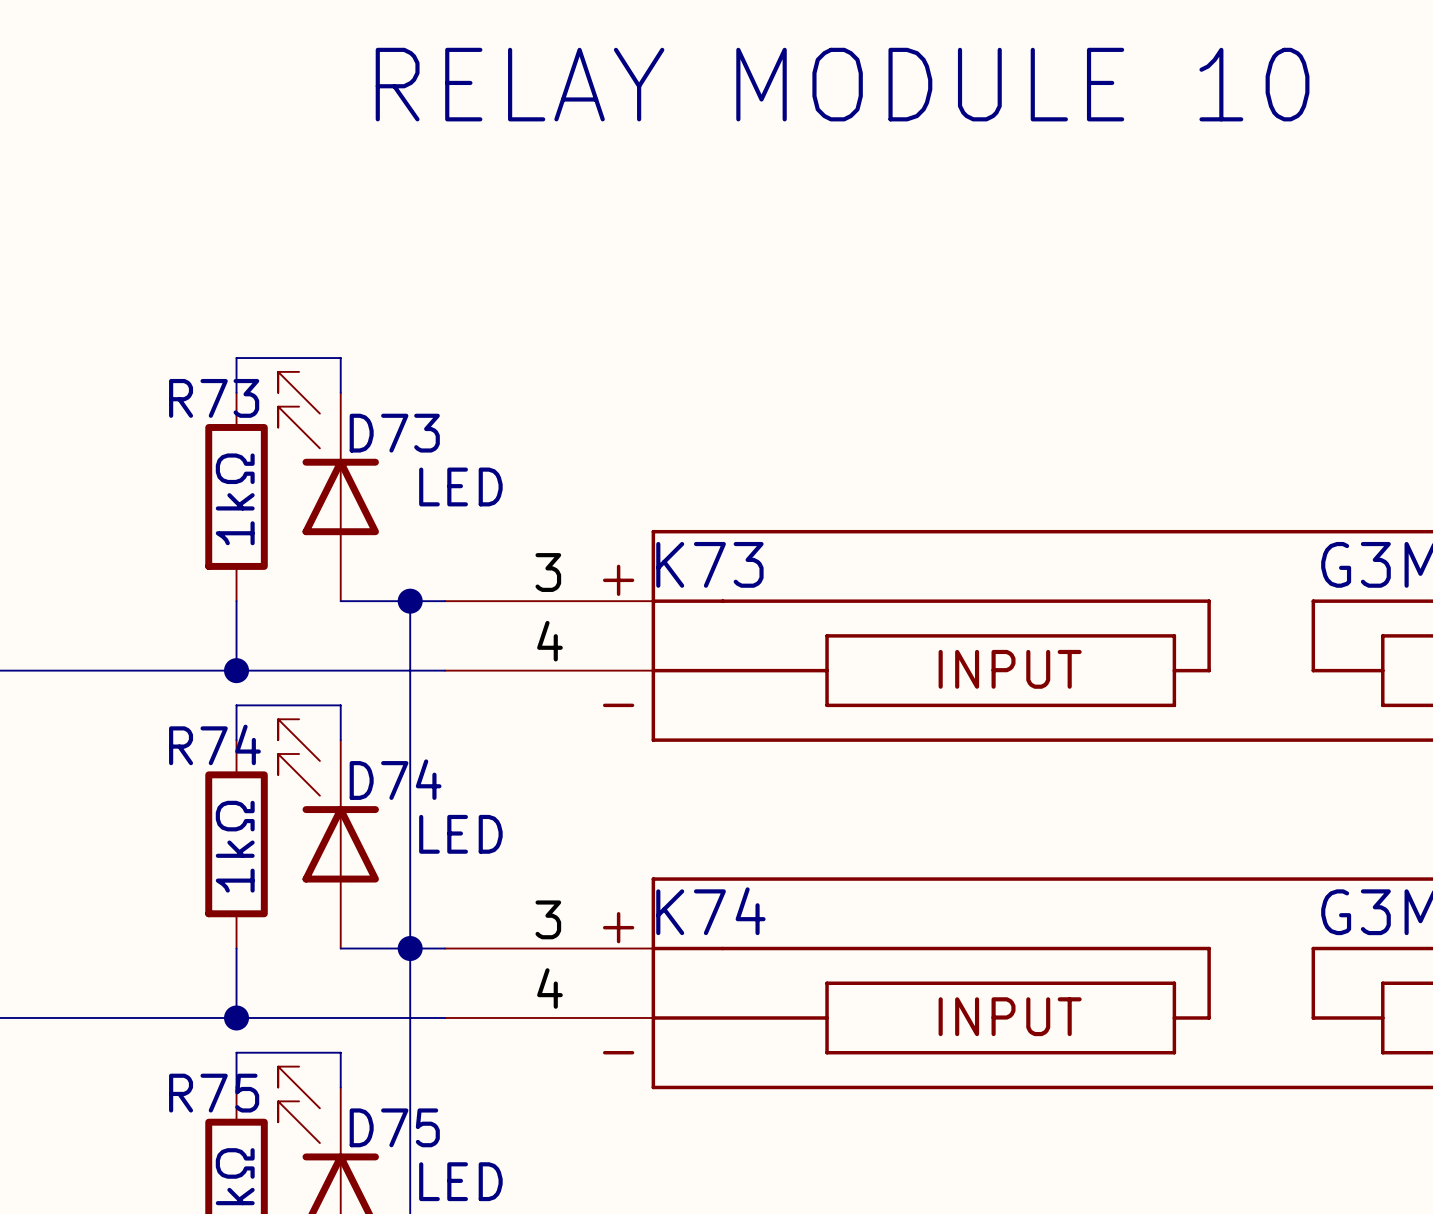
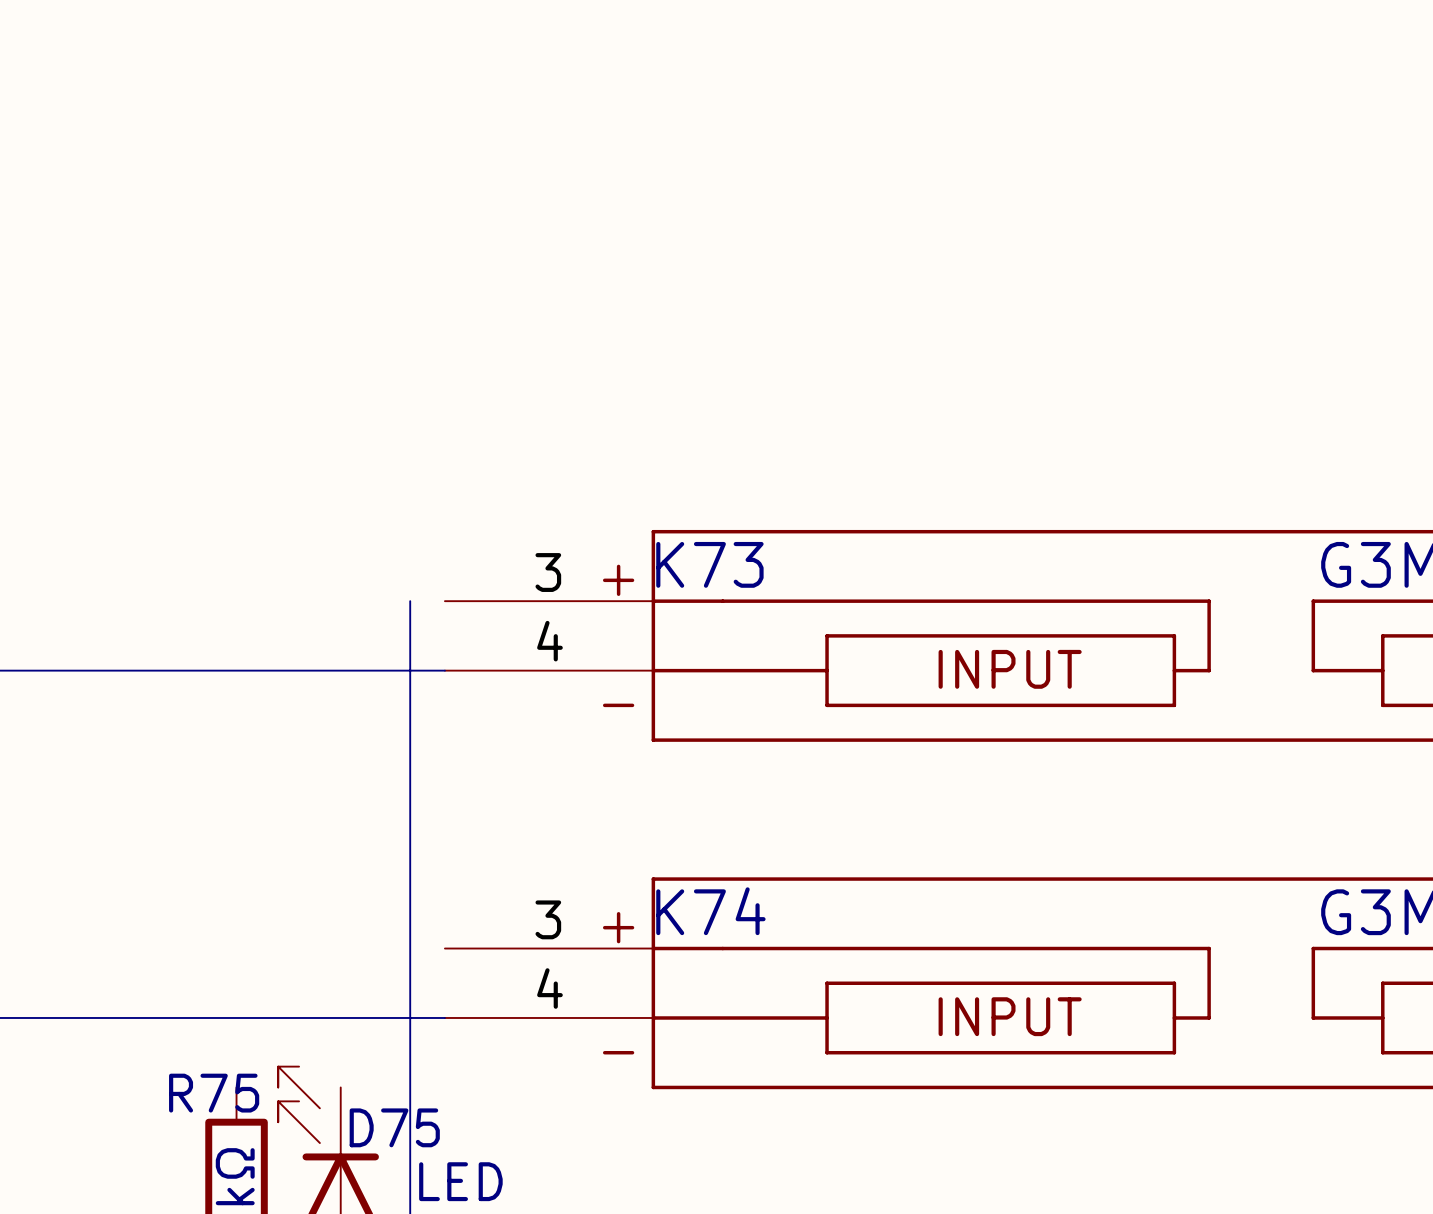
text: RELAY MODULE 10 (842, 84) -> none
wire: (236, 392) (236, 358) (340, 358) (340, 392) -> none
D73: LED (328, 486) -> none
R73: 1kΩ (236, 496) -> none
wire: (236, 601) (236, 670) -> none
wire: (340, 601) (444, 601) -> none
junction: (410, 601) -> none
junction: (236, 670) -> none
wire: (236, 740) (236, 705) (340, 705) (340, 740) -> none
D74: LED (328, 833) -> none
R74: 1kΩ (236, 844) -> none
wire: (236, 948) (236, 1017) -> none
wire: (340, 948) (444, 948) -> none
junction: (410, 948) -> none
junction: (236, 1017) -> none
wire: (236, 1087) (236, 1052) (340, 1052) (340, 1087) -> none

